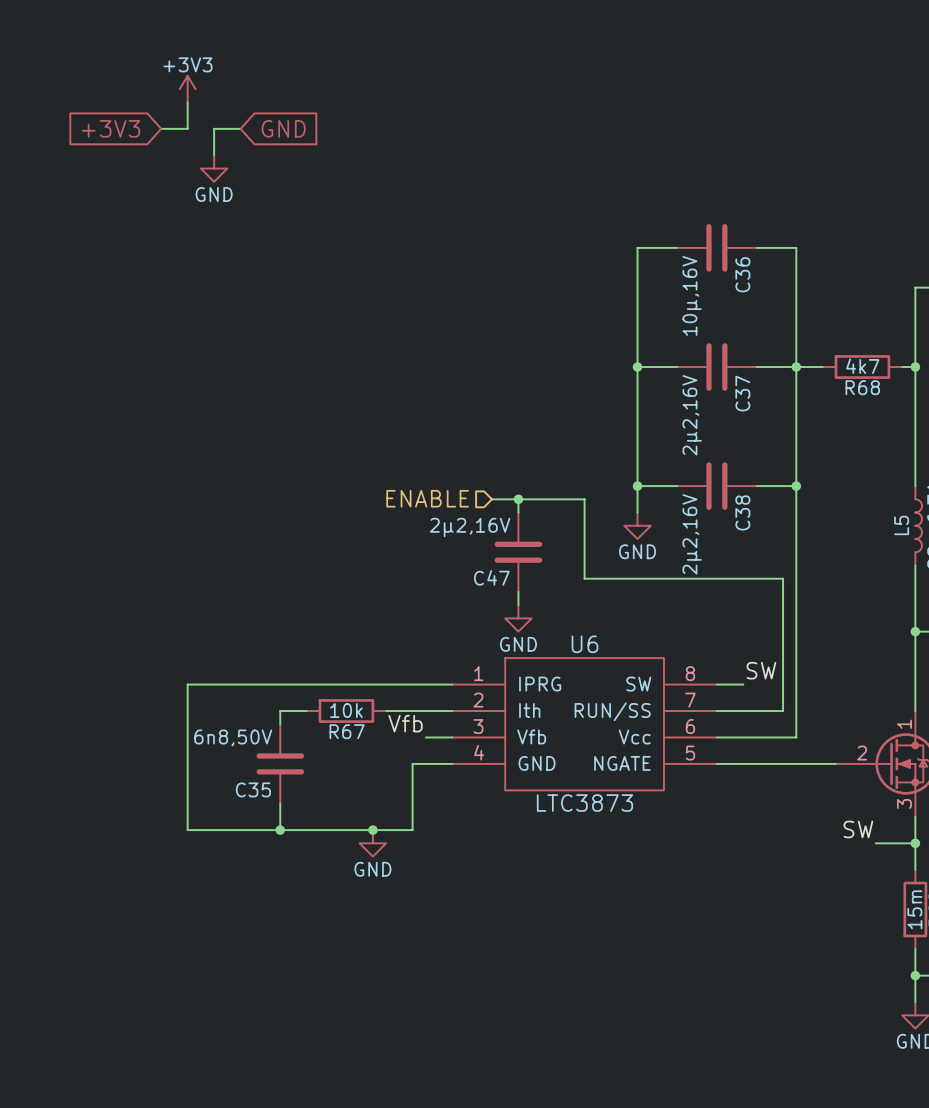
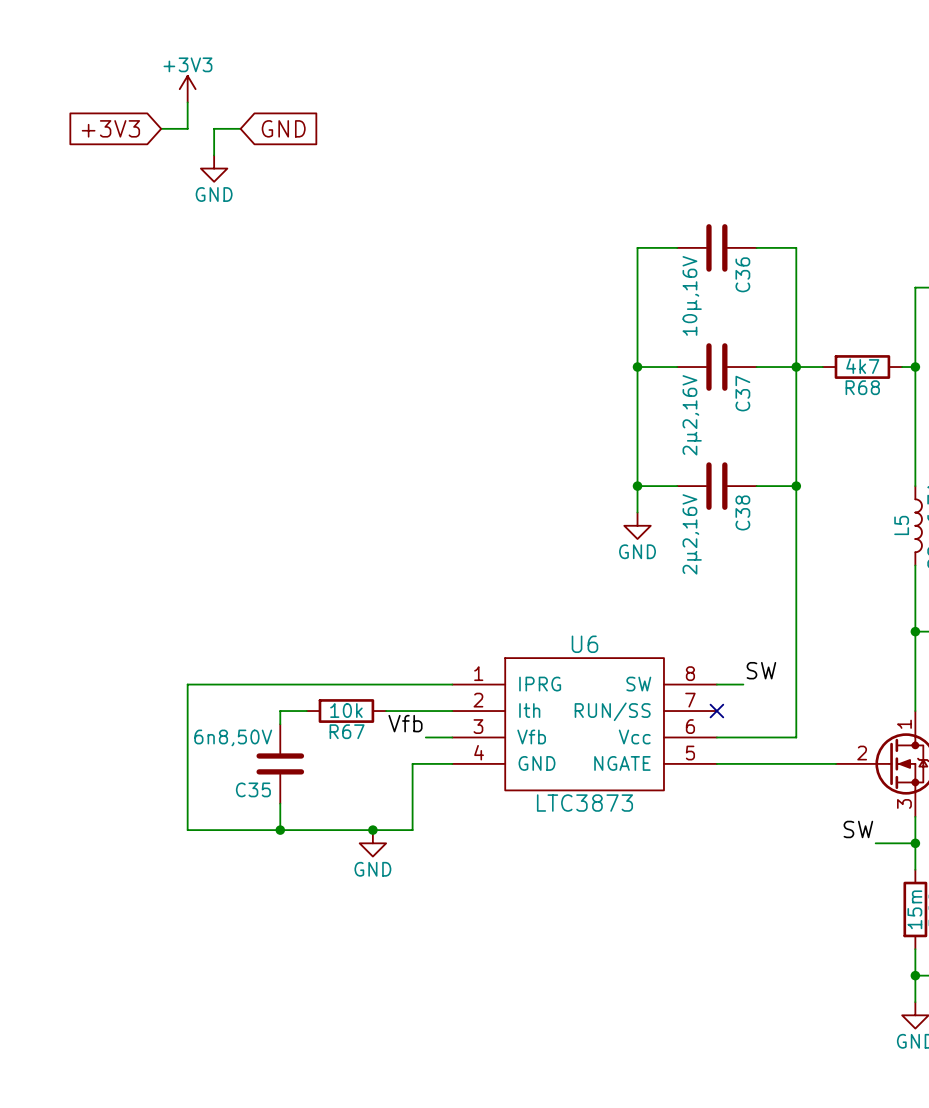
hierarchical label: ENABLE (427, 498) -> none
wire: (491, 499) (584, 499) (584, 578) (783, 578) (783, 711) (716, 711) -> none
wire: (518, 499) (518, 512) -> none
junction: (518, 499) -> none
C47: 2µ2,16V (518, 552) -> none
wire: (518, 591) (518, 605) -> none
power symbol: GND (518, 618) -> none
no-connect mark: none -> (716, 711)

